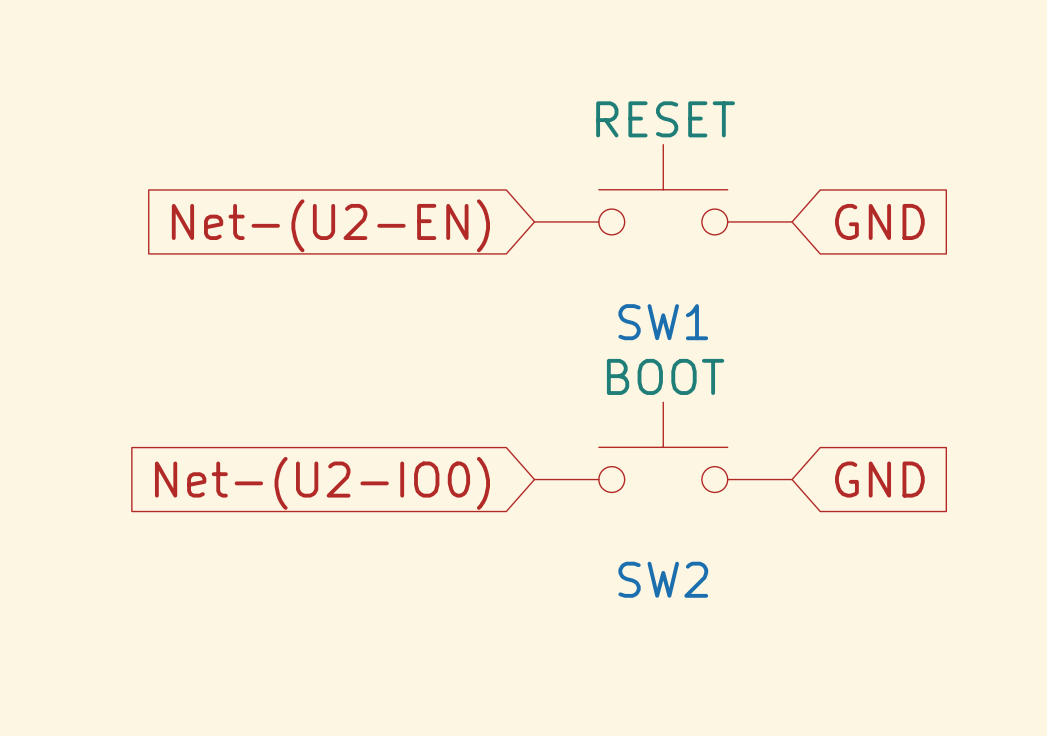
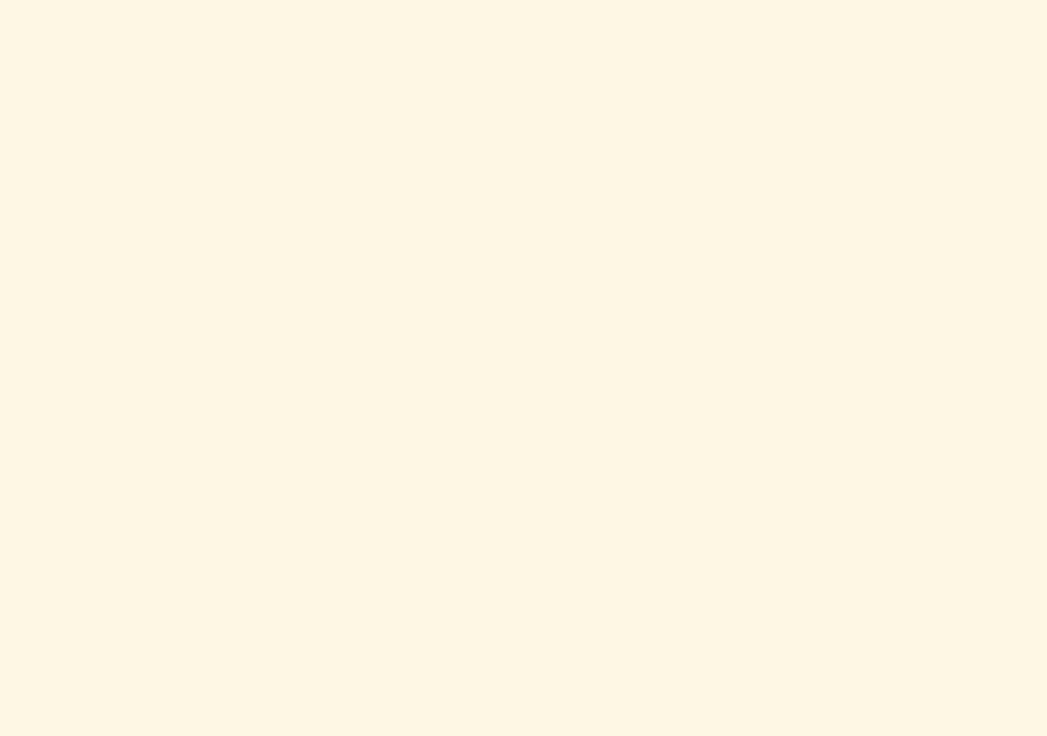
SW1: RESET (663, 189) -> none
global label: GND (879, 221) -> none
global label: Net-(U2-EN) (330, 225) -> none
SW2: BOOT (663, 447) -> none
global label: GND (879, 479) -> none
global label: Net-(U2-IO0) (322, 483) -> none

